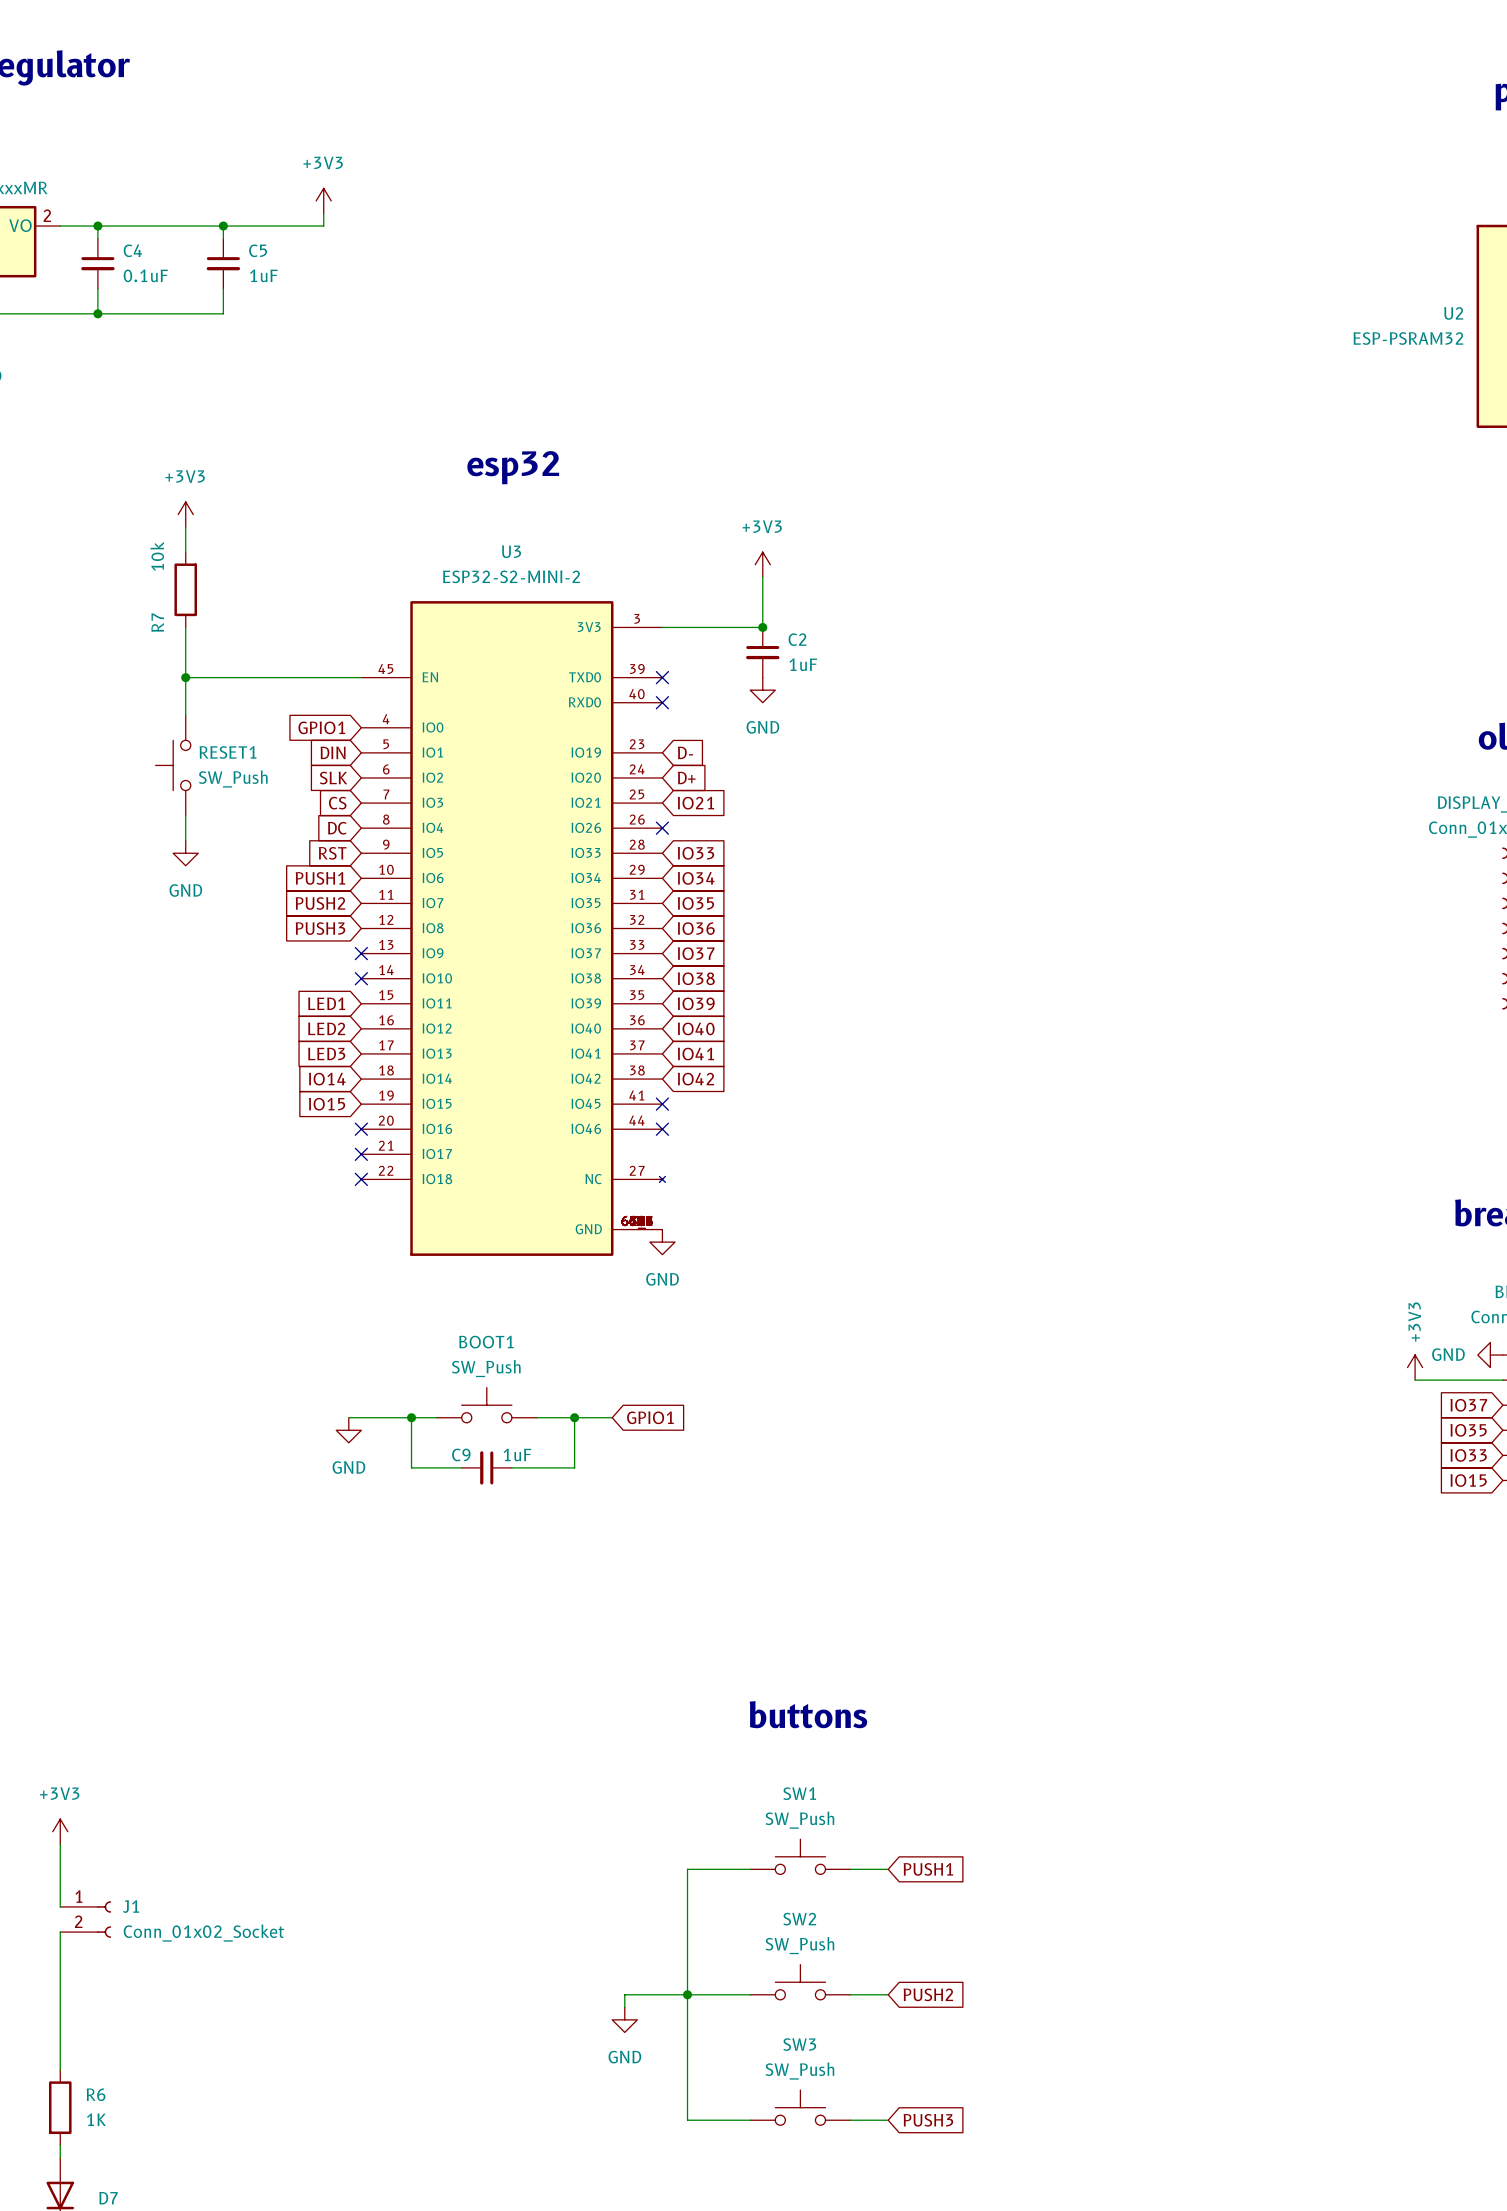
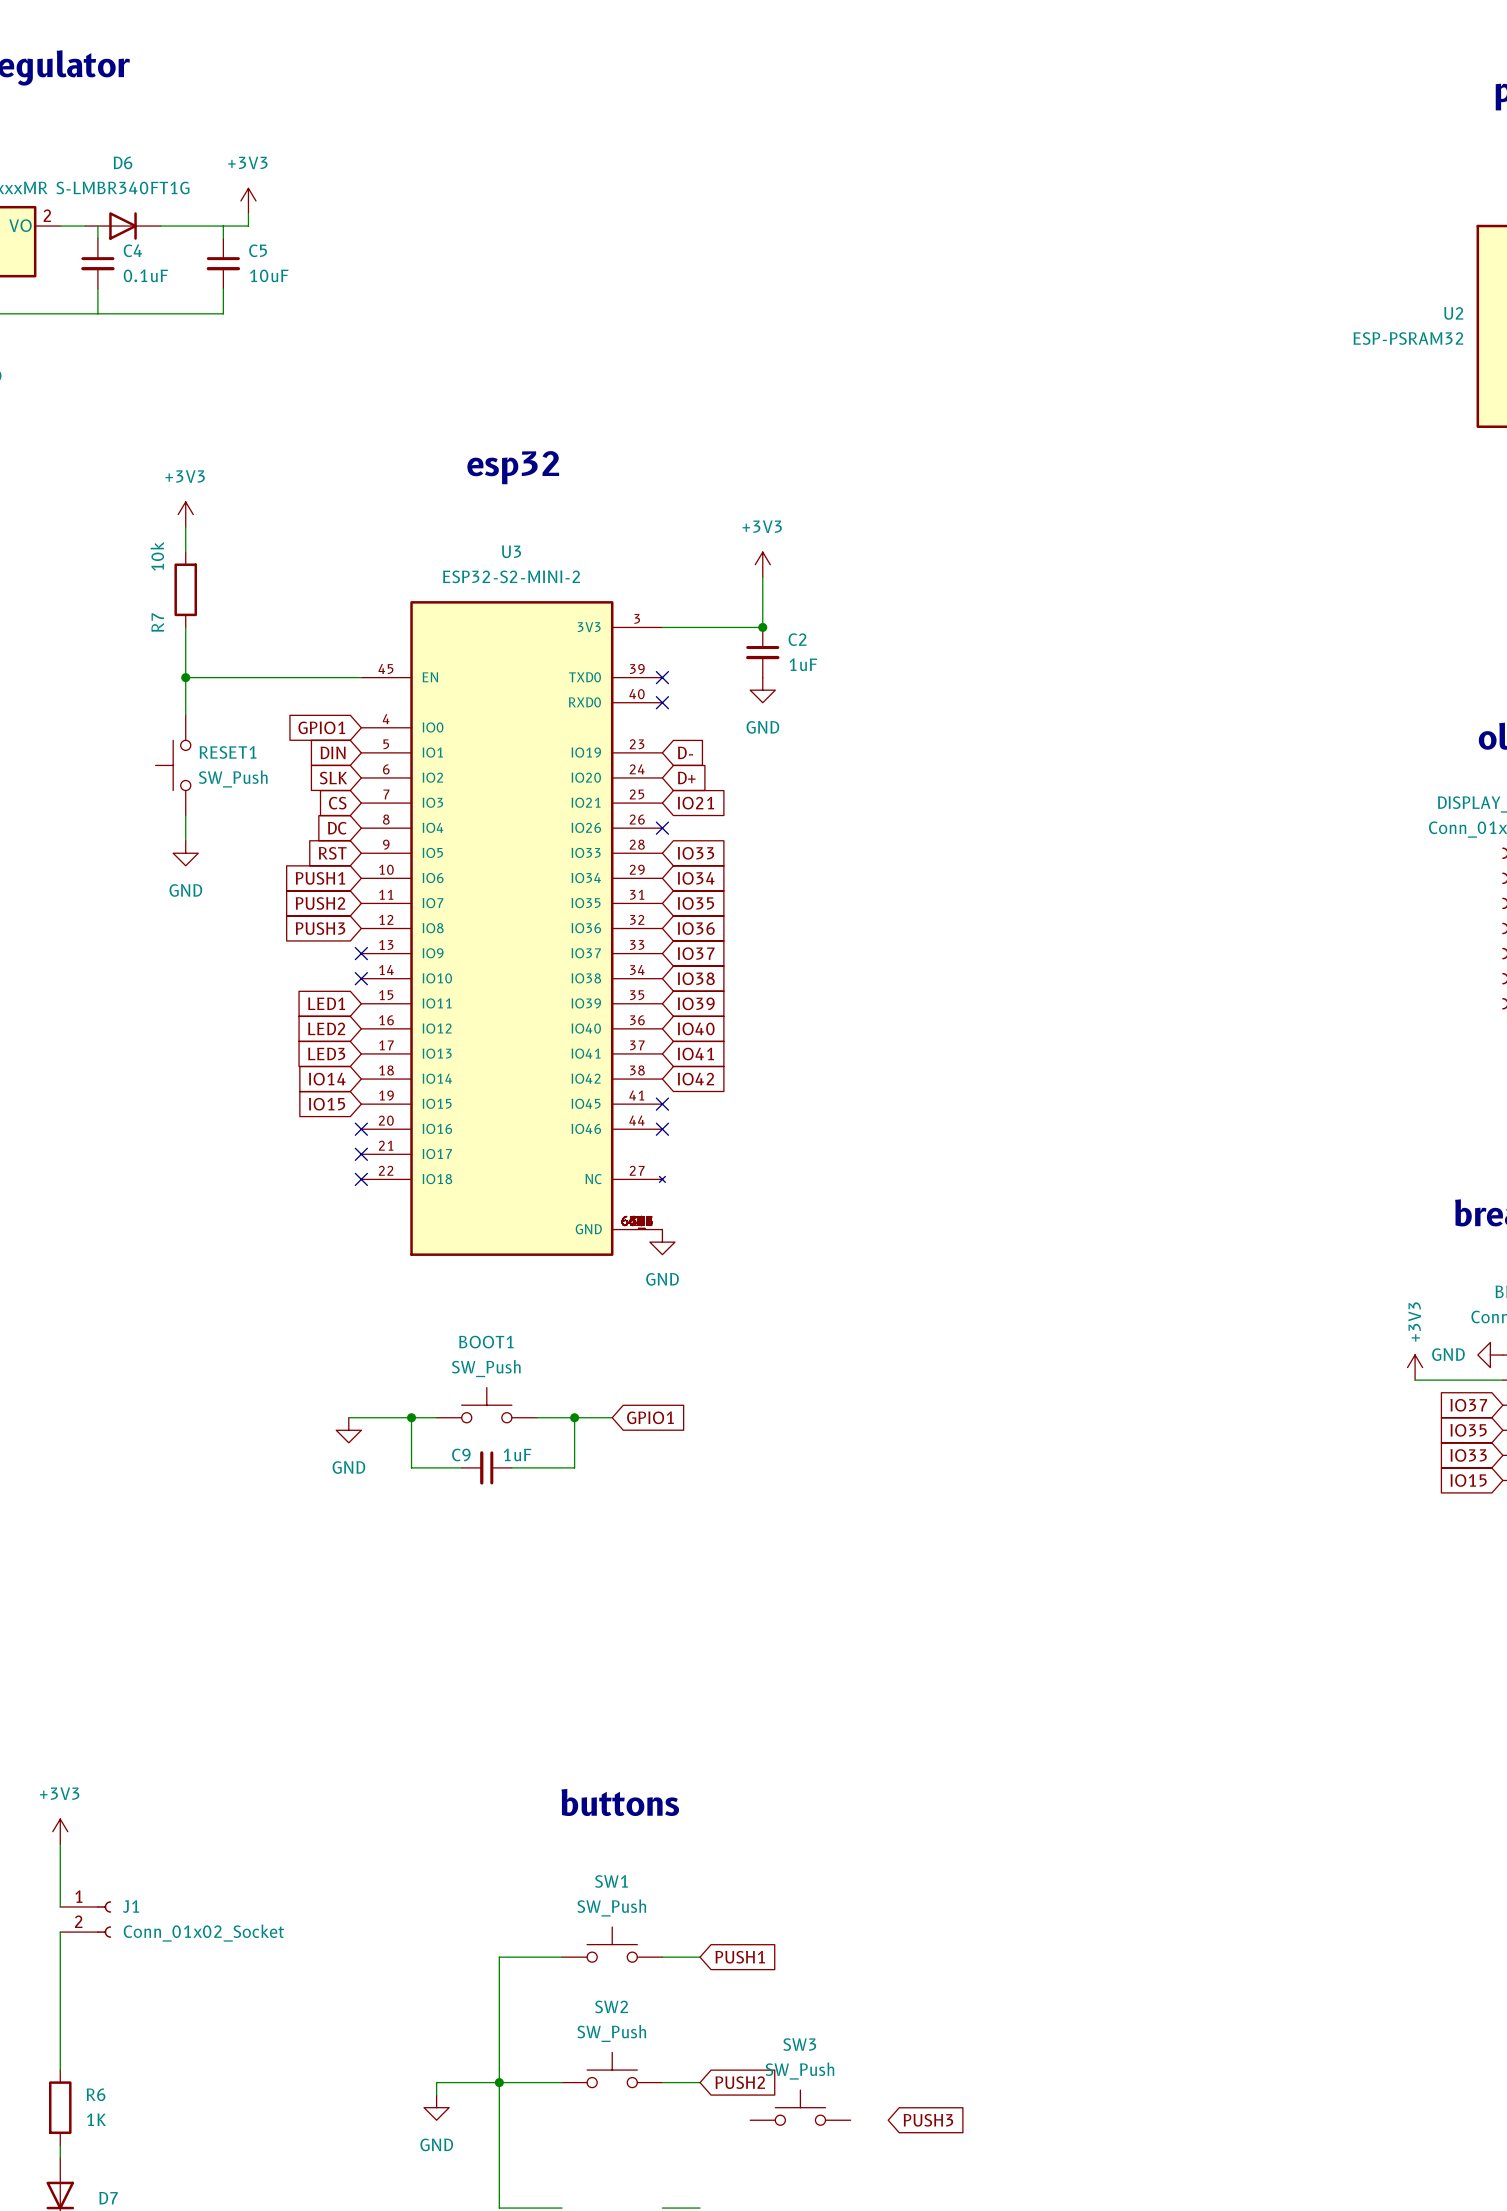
power symbol position: +3V3 (323, 200) -> +3V3 (248, 200)
wire: (323, 213) (323, 226) (248, 226) -> (248, 213) (248, 226)
junction: (97, 226) -> none
D6: none -> S-LMBR340FT1G (123, 226)
junction: (223, 226) -> none
C5 value: 1uF (263, 275) -> 10uF (269, 275)
junction: (97, 313) -> none
text position: buttons (808, 1714) -> buttons (620, 1802)
SW1 position: (800, 1856) -> (612, 1944)
wire: (750, 1869) (687, 1869) (687, 2120) (750, 2120) -> (562, 1957) (499, 1957) (499, 2208) (562, 2208)
wire: (850, 1869) (888, 1869) -> (662, 1957) (700, 1957)
global label position: PUSH1 (928, 1869) -> PUSH1 (740, 1957)
SW2 position: (800, 1982) -> (612, 2070)
junction: (687, 1994) -> none
wire: (750, 1994) (624, 1994) (624, 2007) -> (562, 2082) (436, 2082) (436, 2095)
wire: (850, 1994) (888, 1994) -> (662, 2082) (700, 2082)
global label position: PUSH2 (928, 1994) -> PUSH2 (740, 2082)
power symbol: GND (624, 2019) -> none
junction: none -> (499, 2082)
power symbol: none -> GND (436, 2107)
wire: (850, 2120) (888, 2120) -> (662, 2208) (700, 2208)

